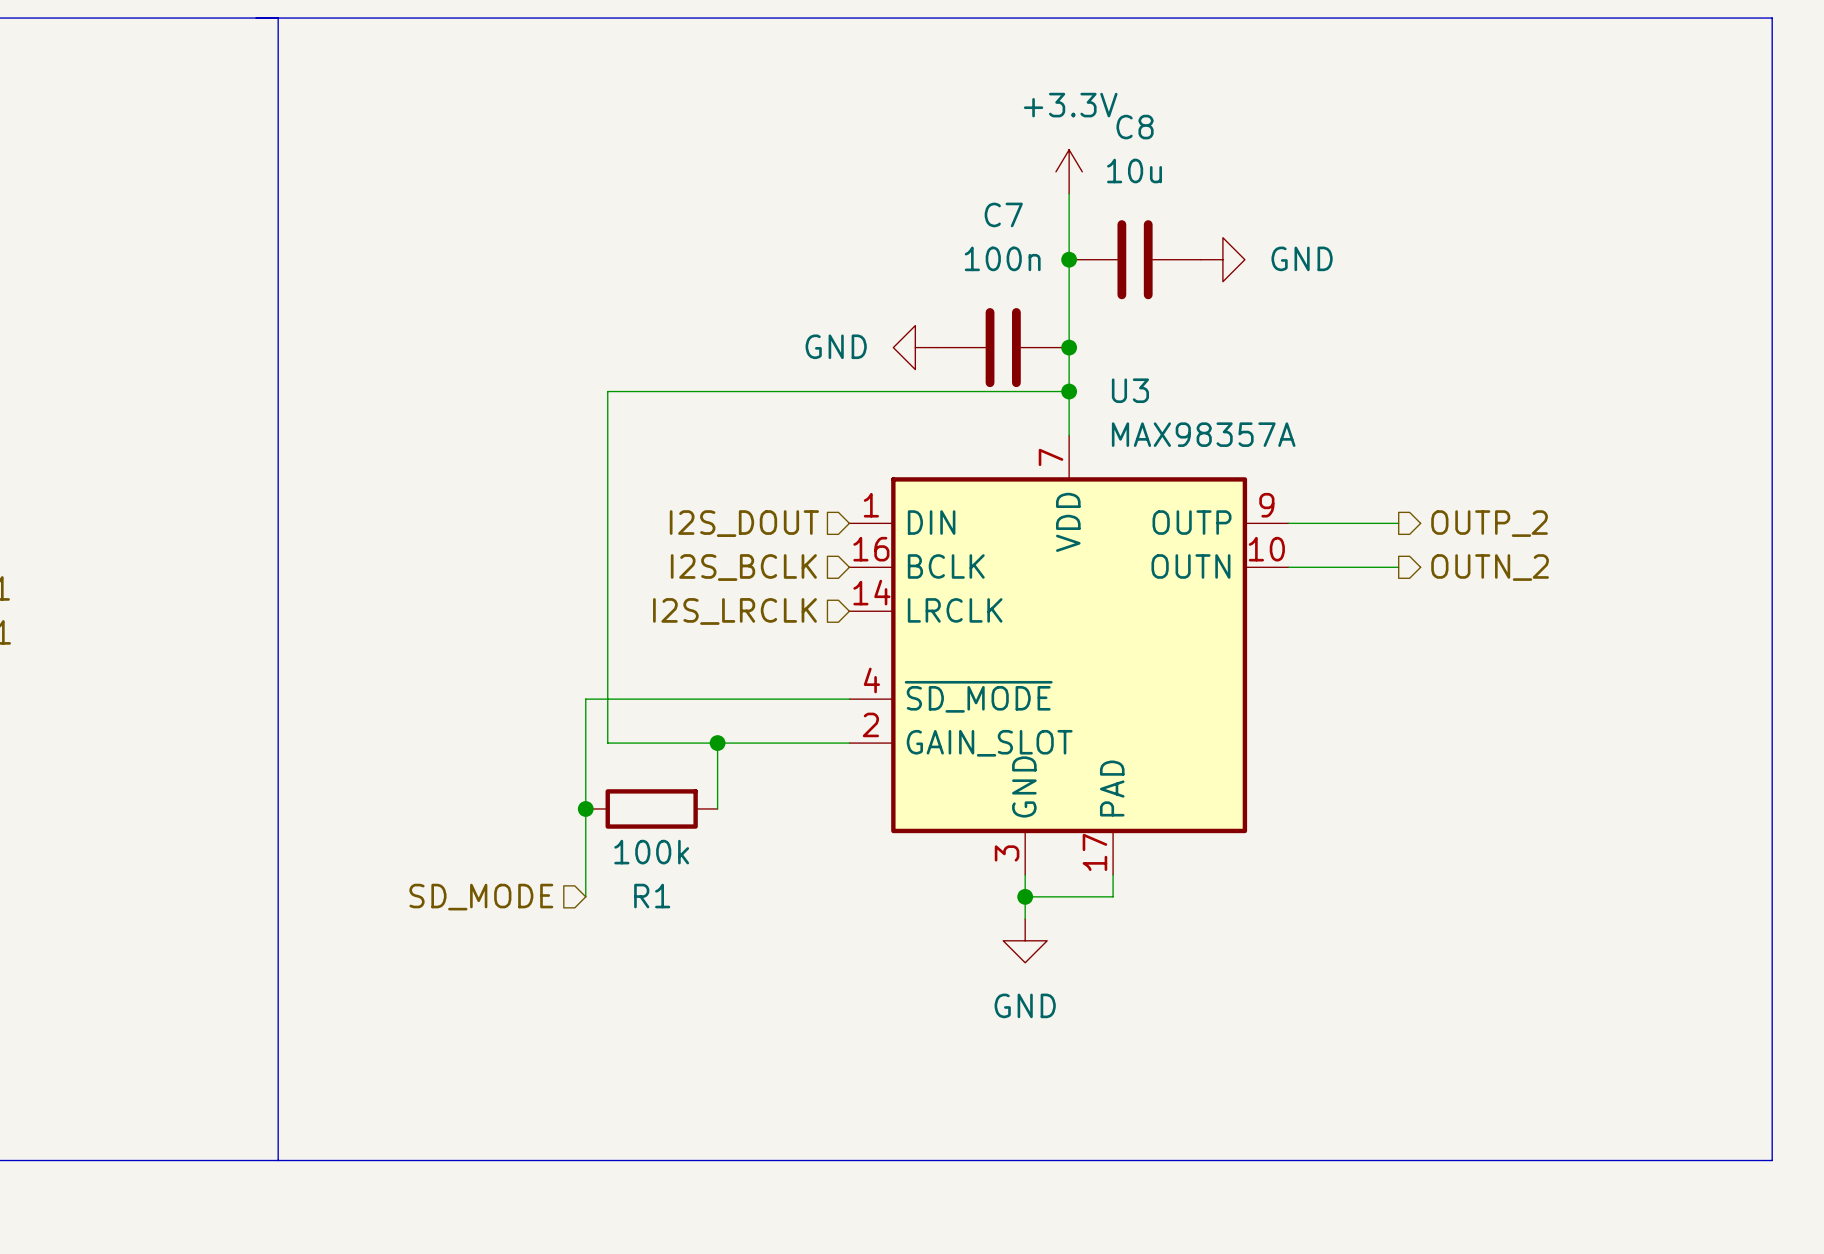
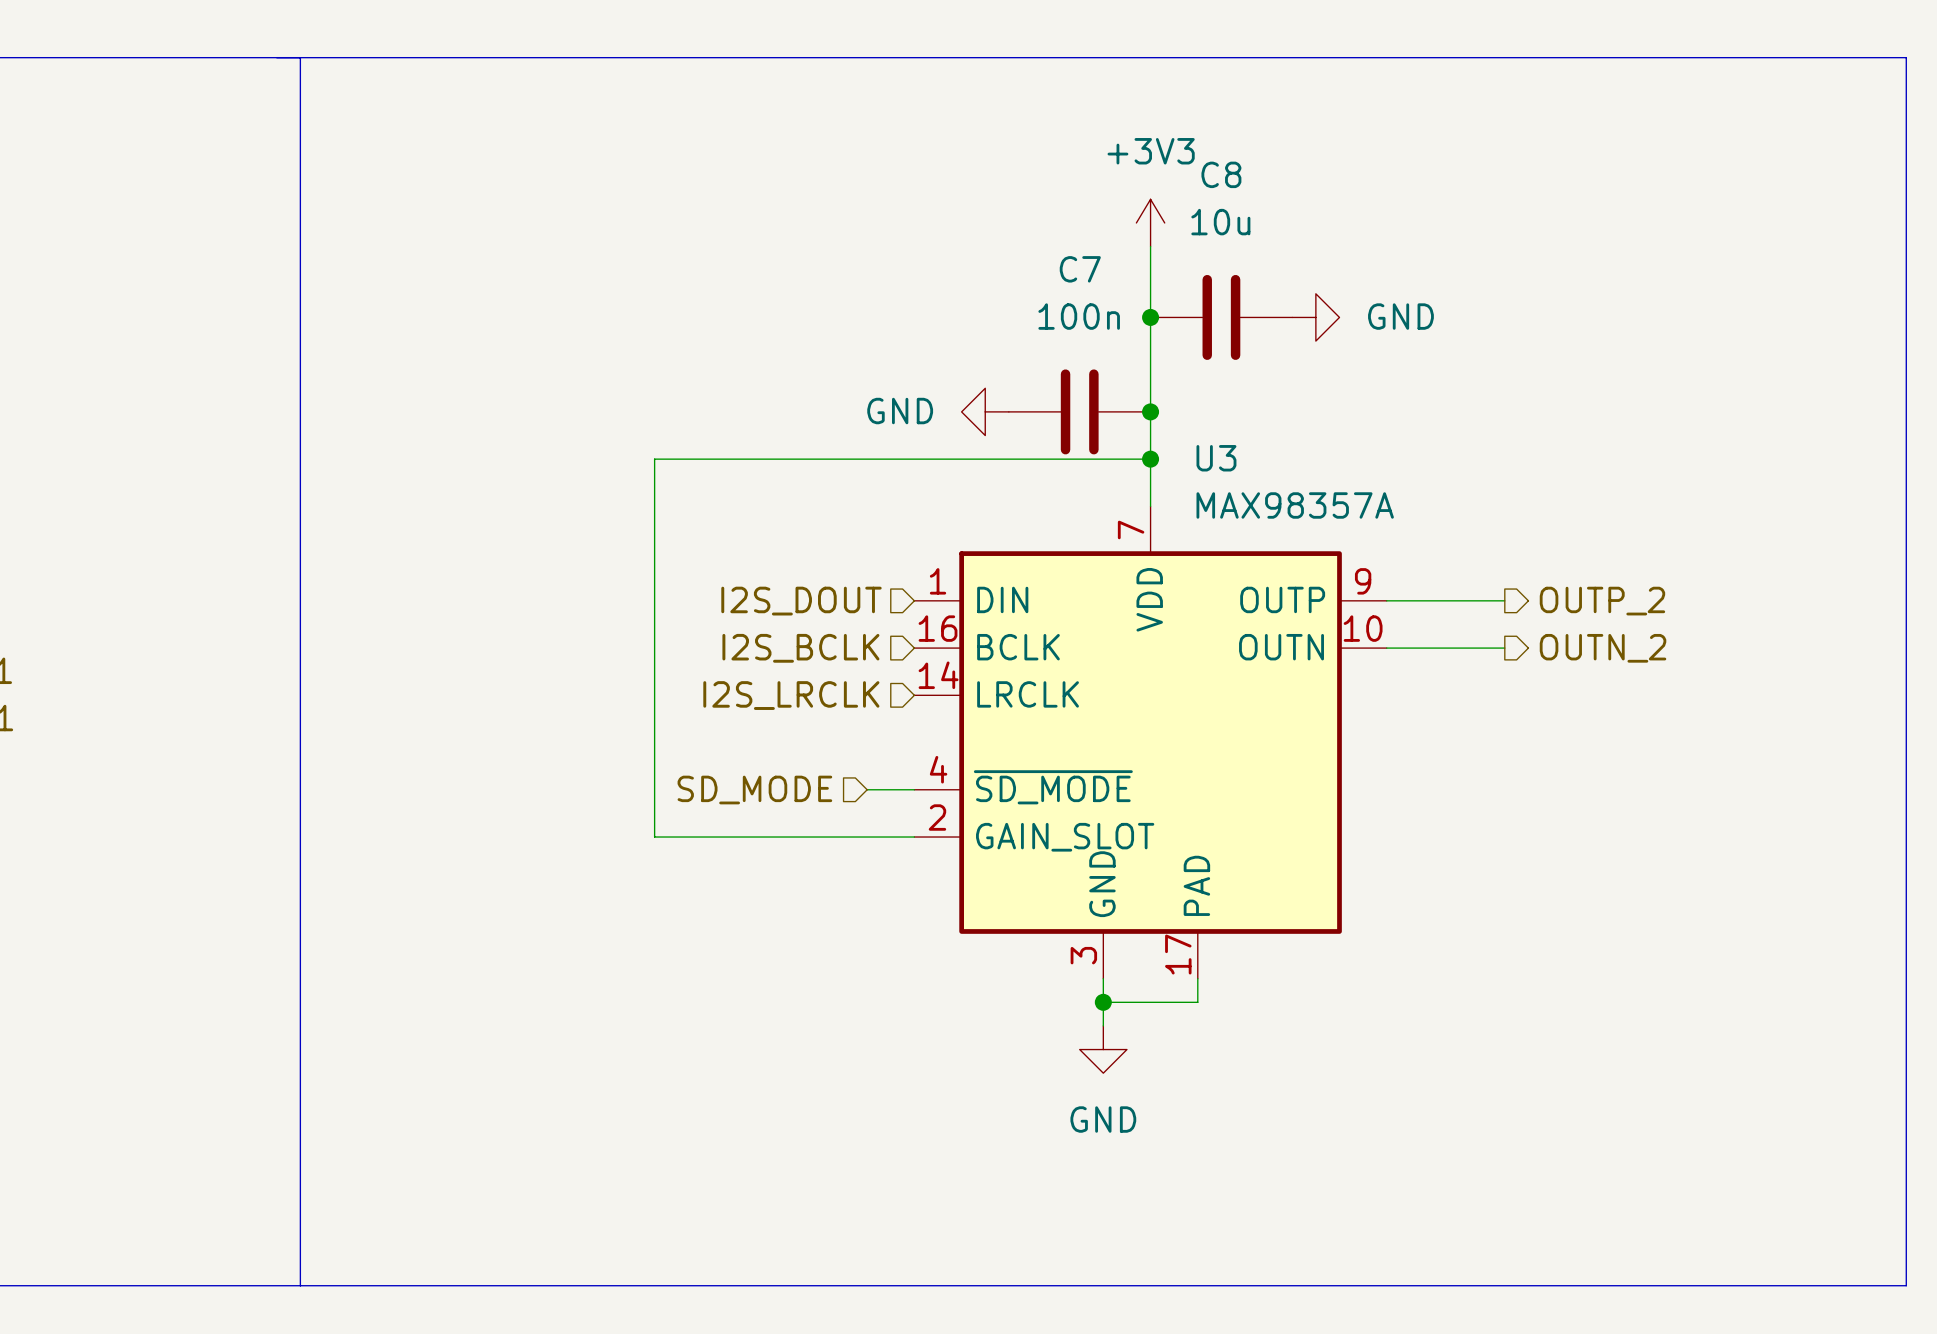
power symbol: +3.3V (1069, 171) -> +3V3 (1150, 222)
wire: (805, 699) (585, 699) (585, 896) -> none
wire: (717, 743) (717, 808) -> none
junction: (717, 743) -> none
junction: (585, 808) -> none
R1: 100k (651, 808) -> none
hierarchical label position: SD_MODE (481, 897) -> SD_MODE (754, 790)

